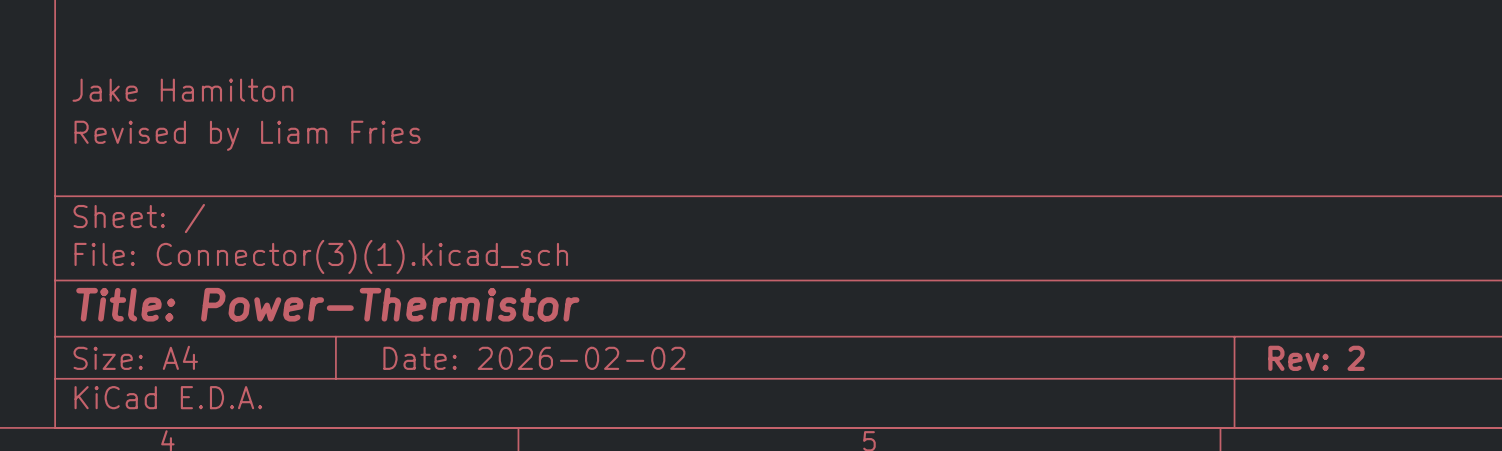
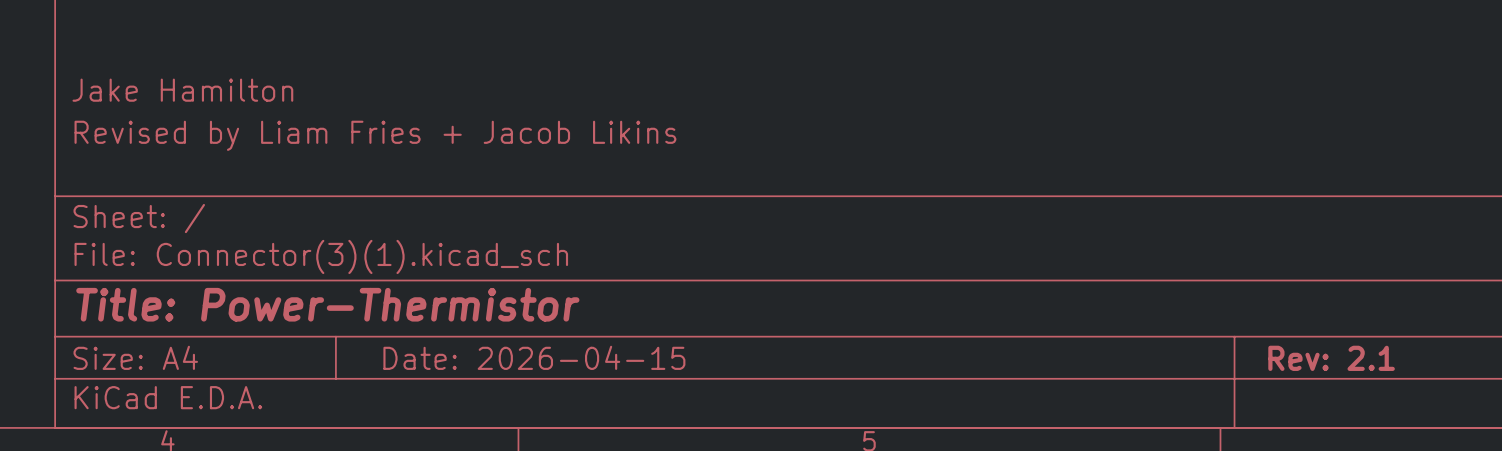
title block: Revised by Liam Fries (247, 135) -> Revised by Liam Fries + Jacob Likins (375, 135)
title block: Date: 2026-02-02 (534, 358) -> Date: 2026-04-15 (534, 357)
title block: Rev: 2 (1316, 358) -> Rev: 2.1 (1331, 358)

